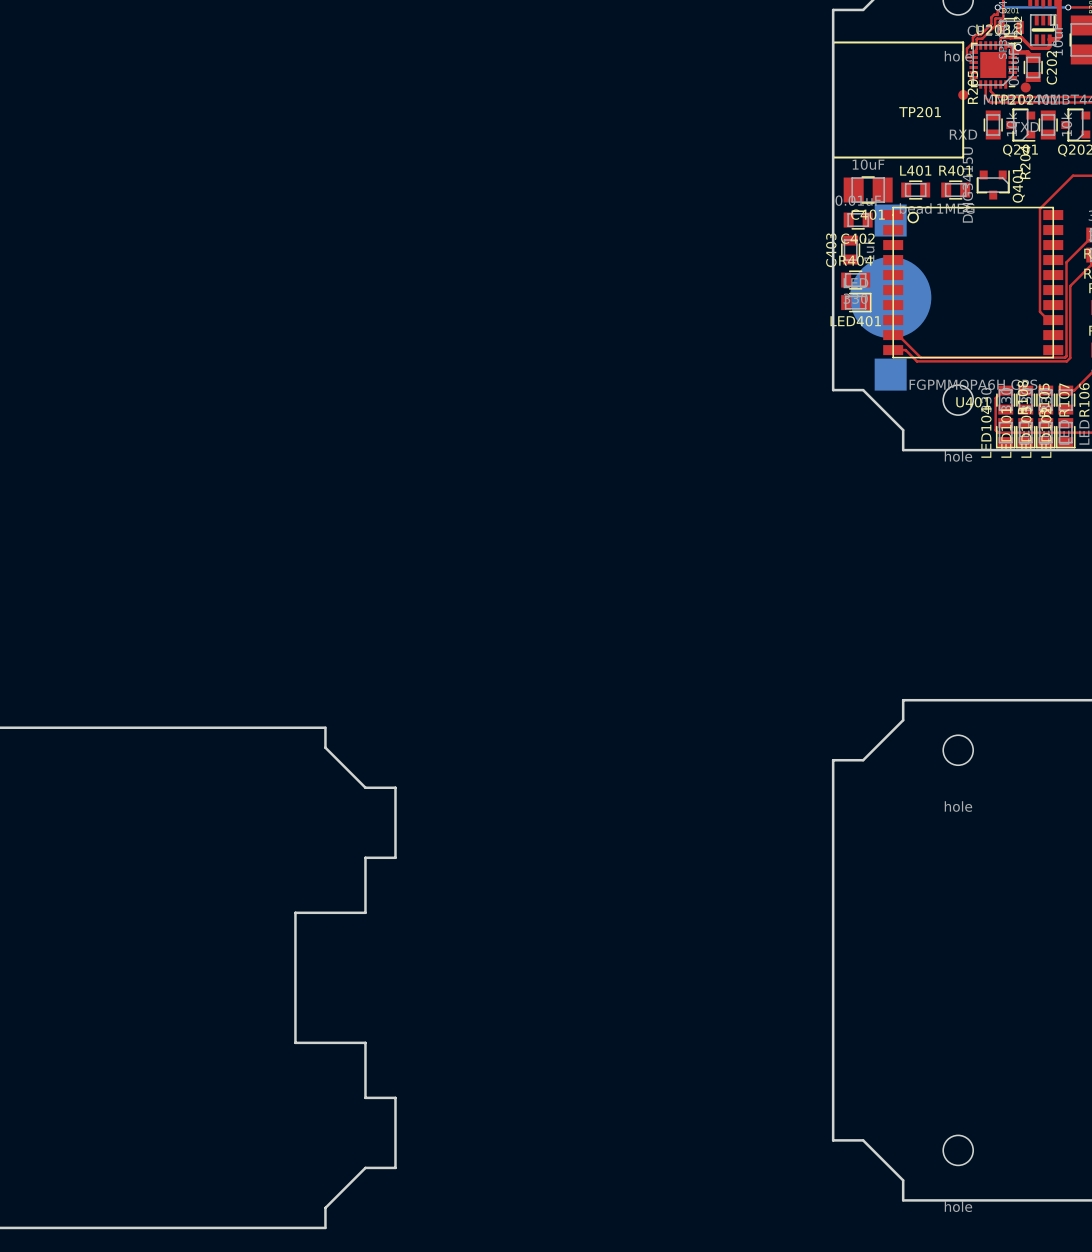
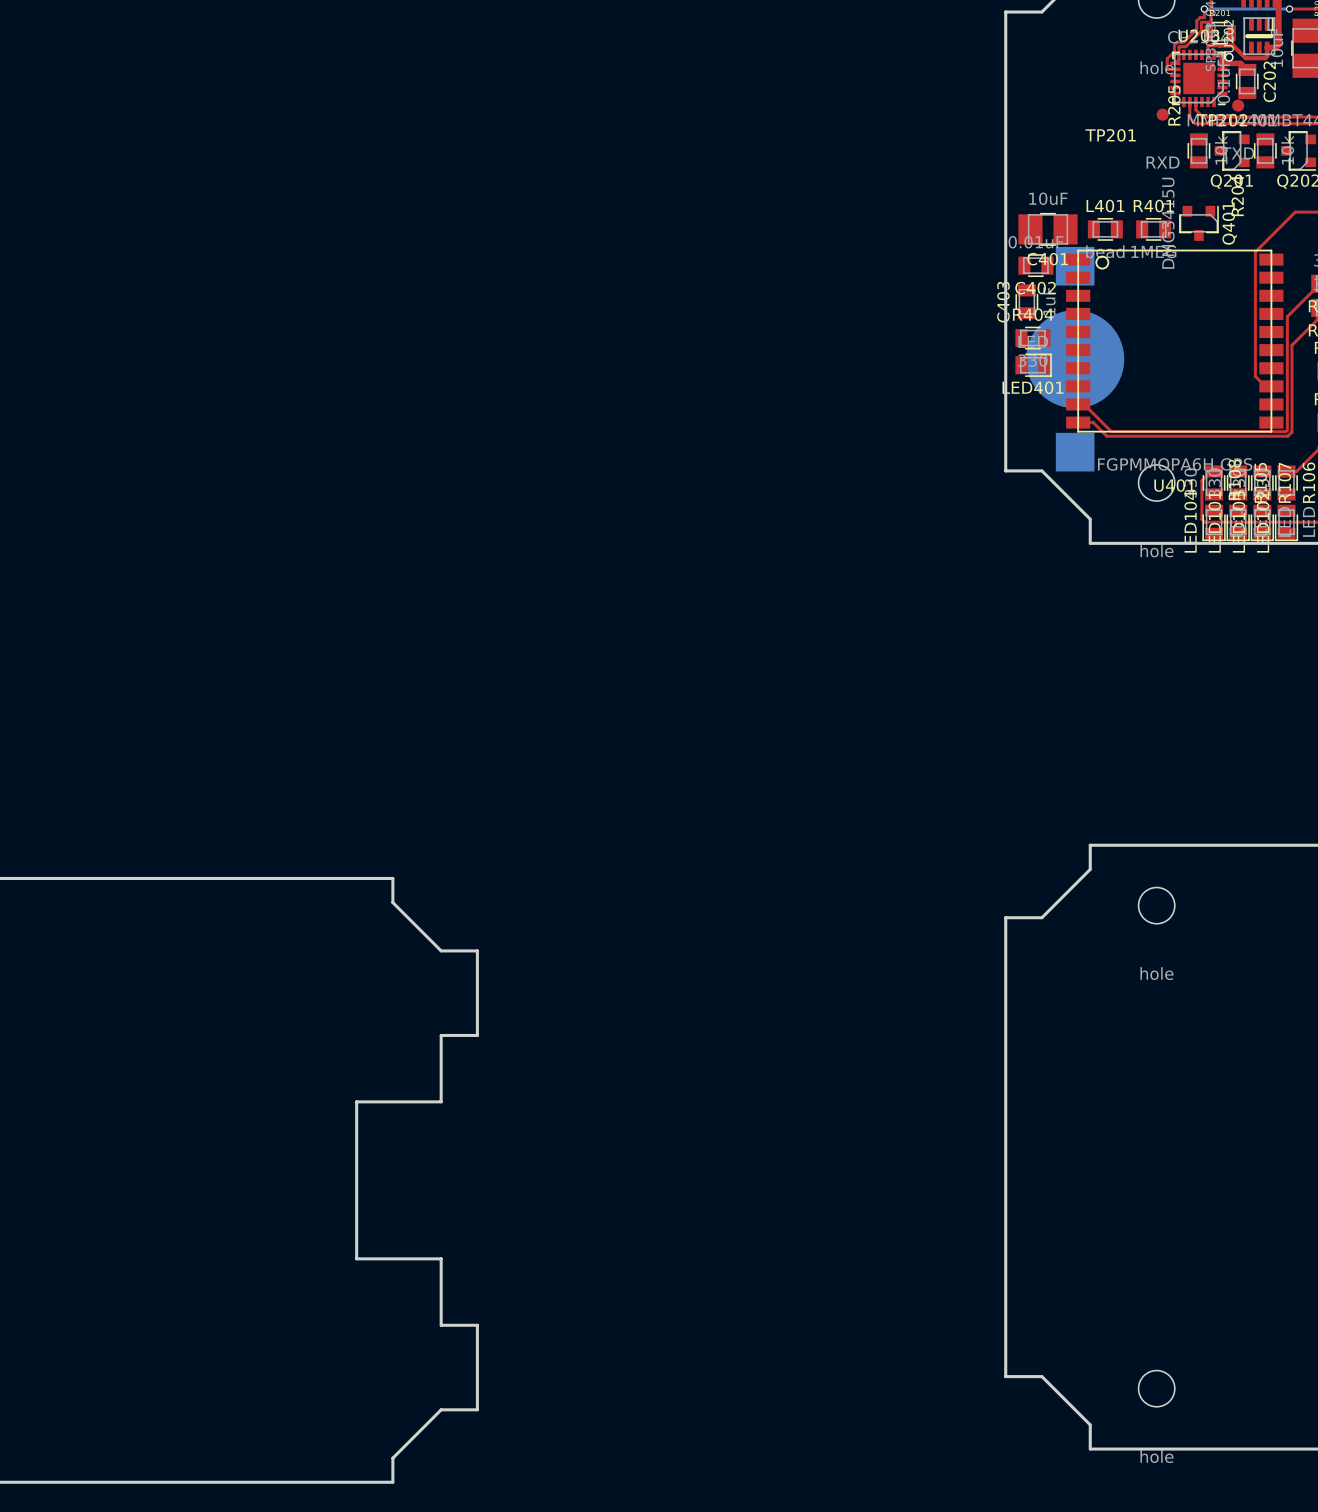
line: (833, 42) (833, 157) (963, 157) (963, 42) (833, 42) -> none

